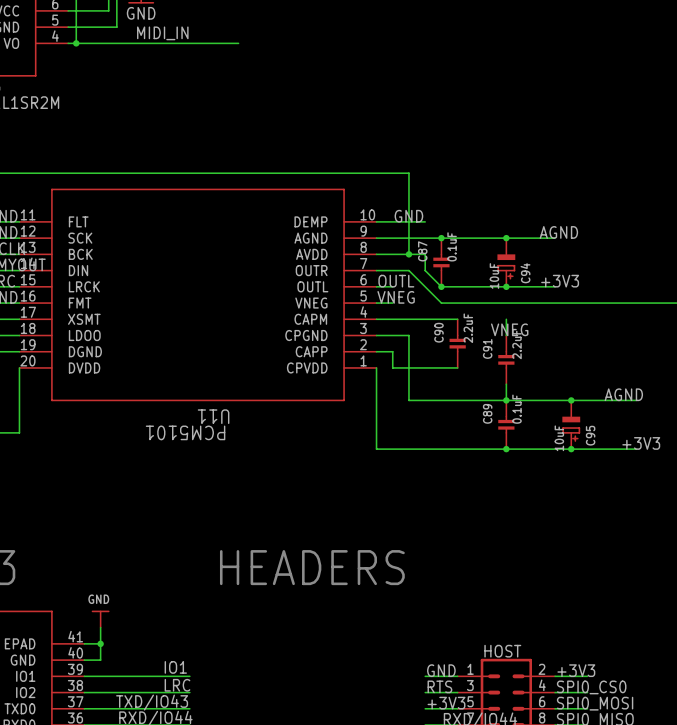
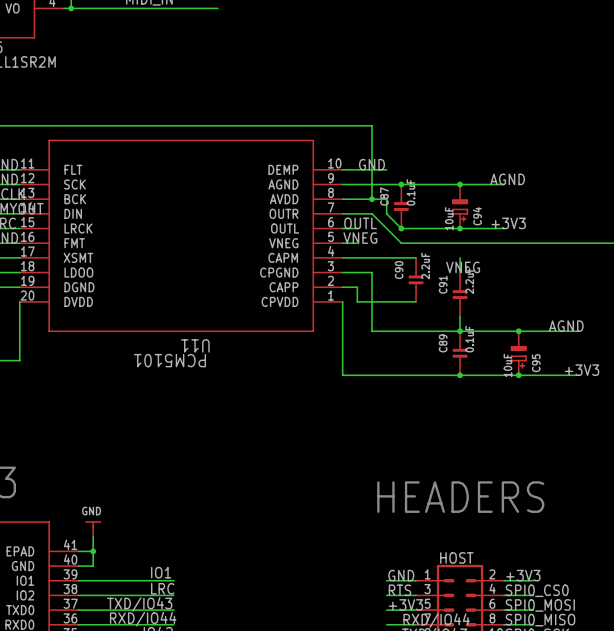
text: HEADERS (312, 567) -> none
text: none -> HEADERS (460, 497)

